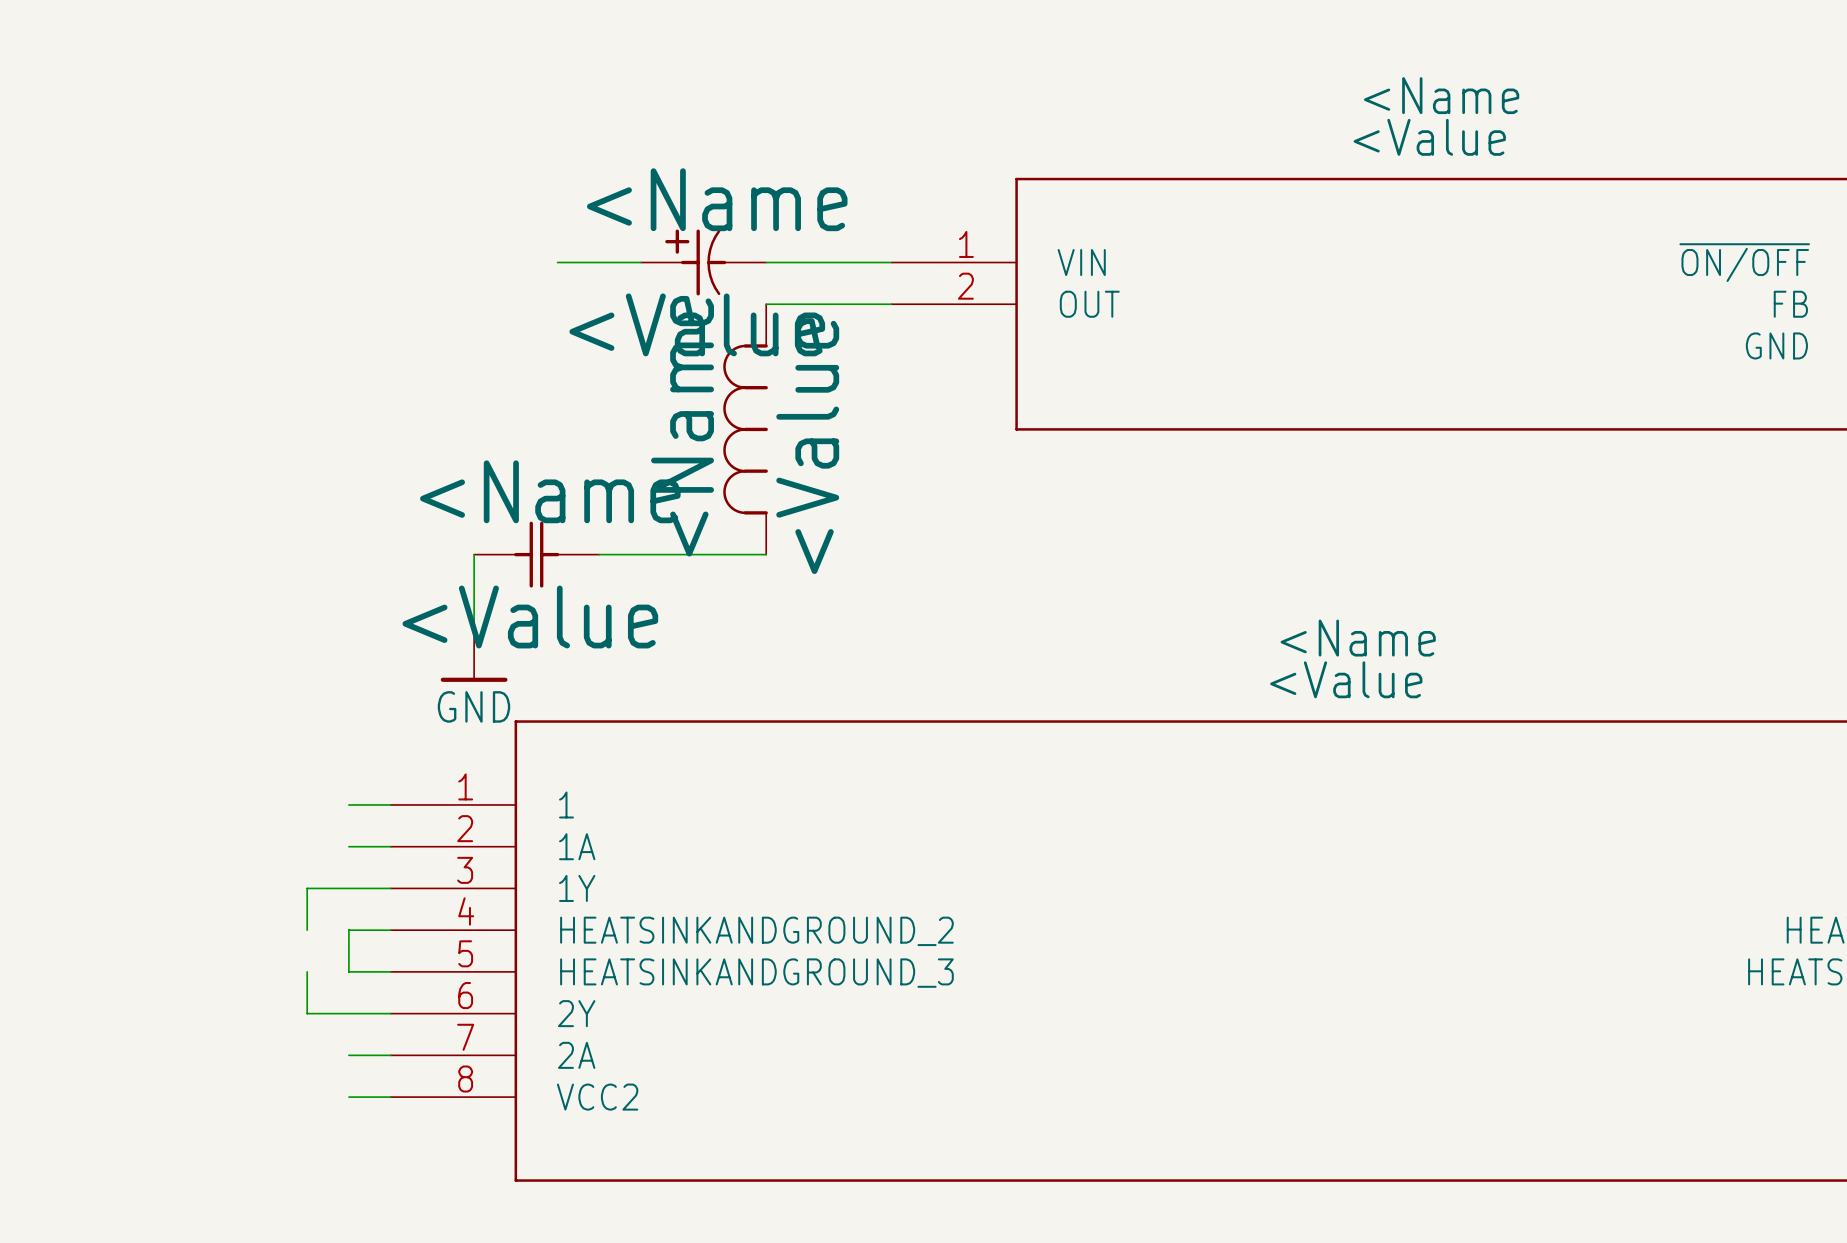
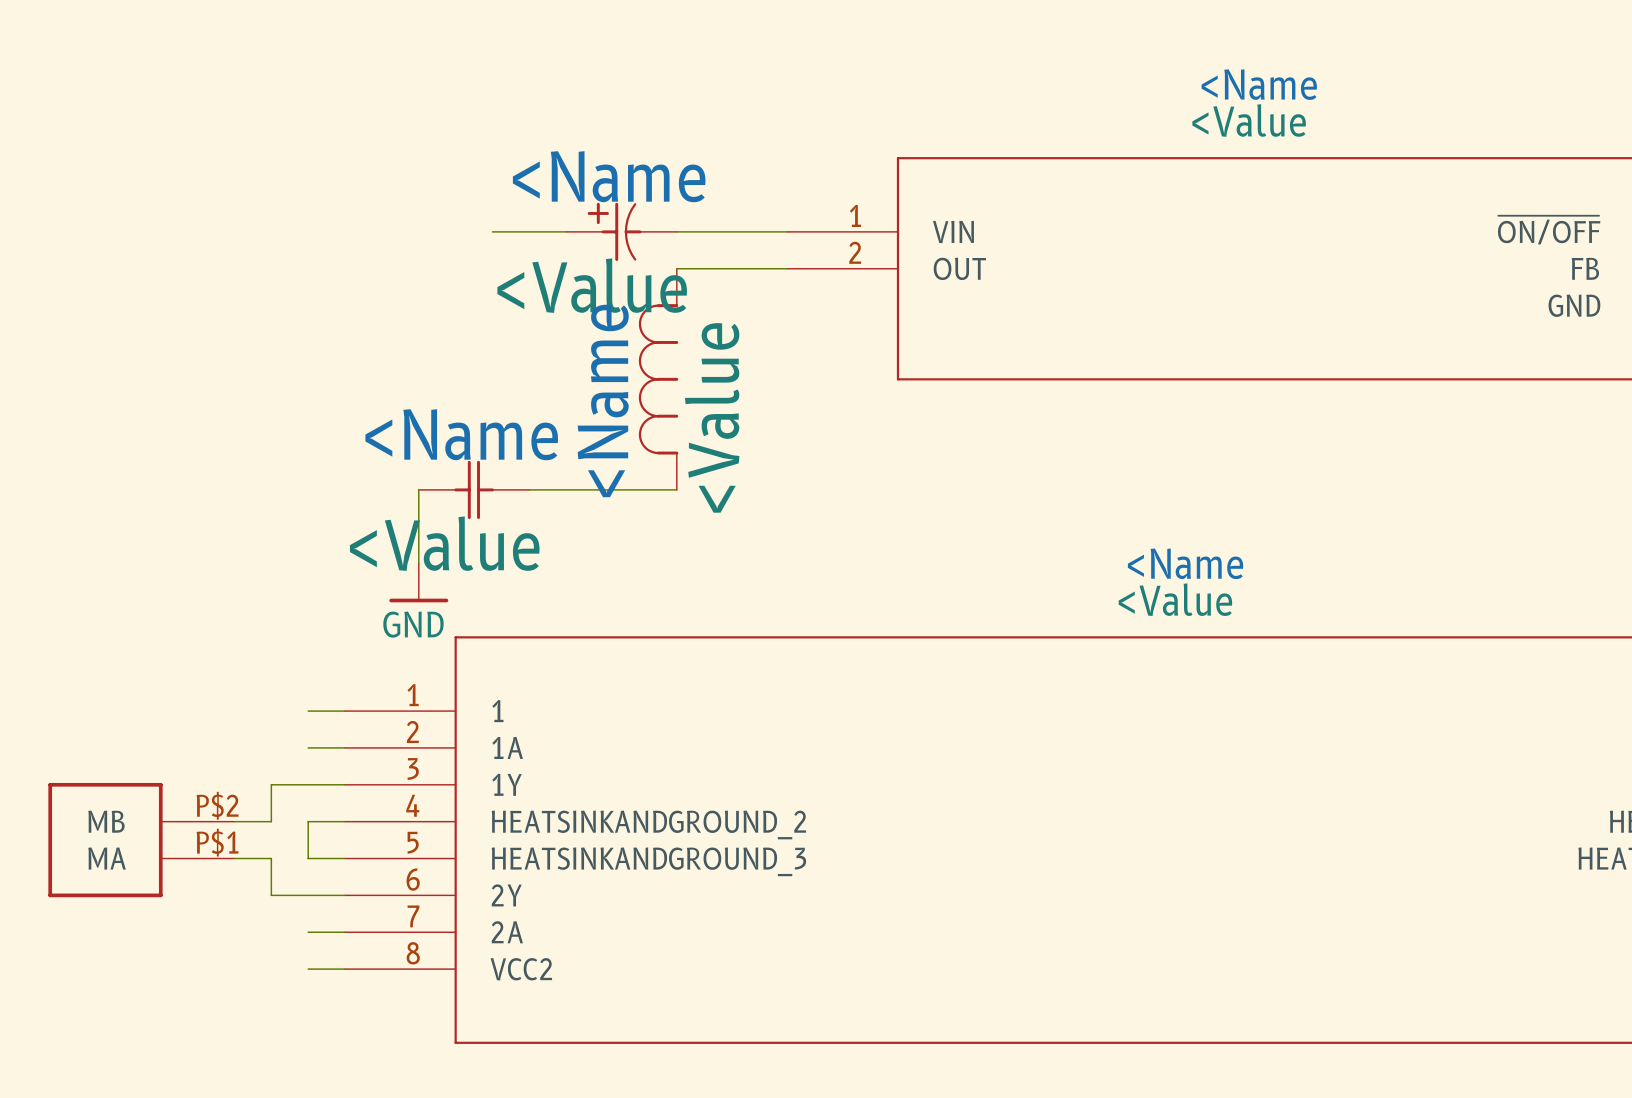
wire: none -> (234, 821) (271, 821)
part: none -> (141, 840)
wire: none -> (234, 858) (271, 858)

